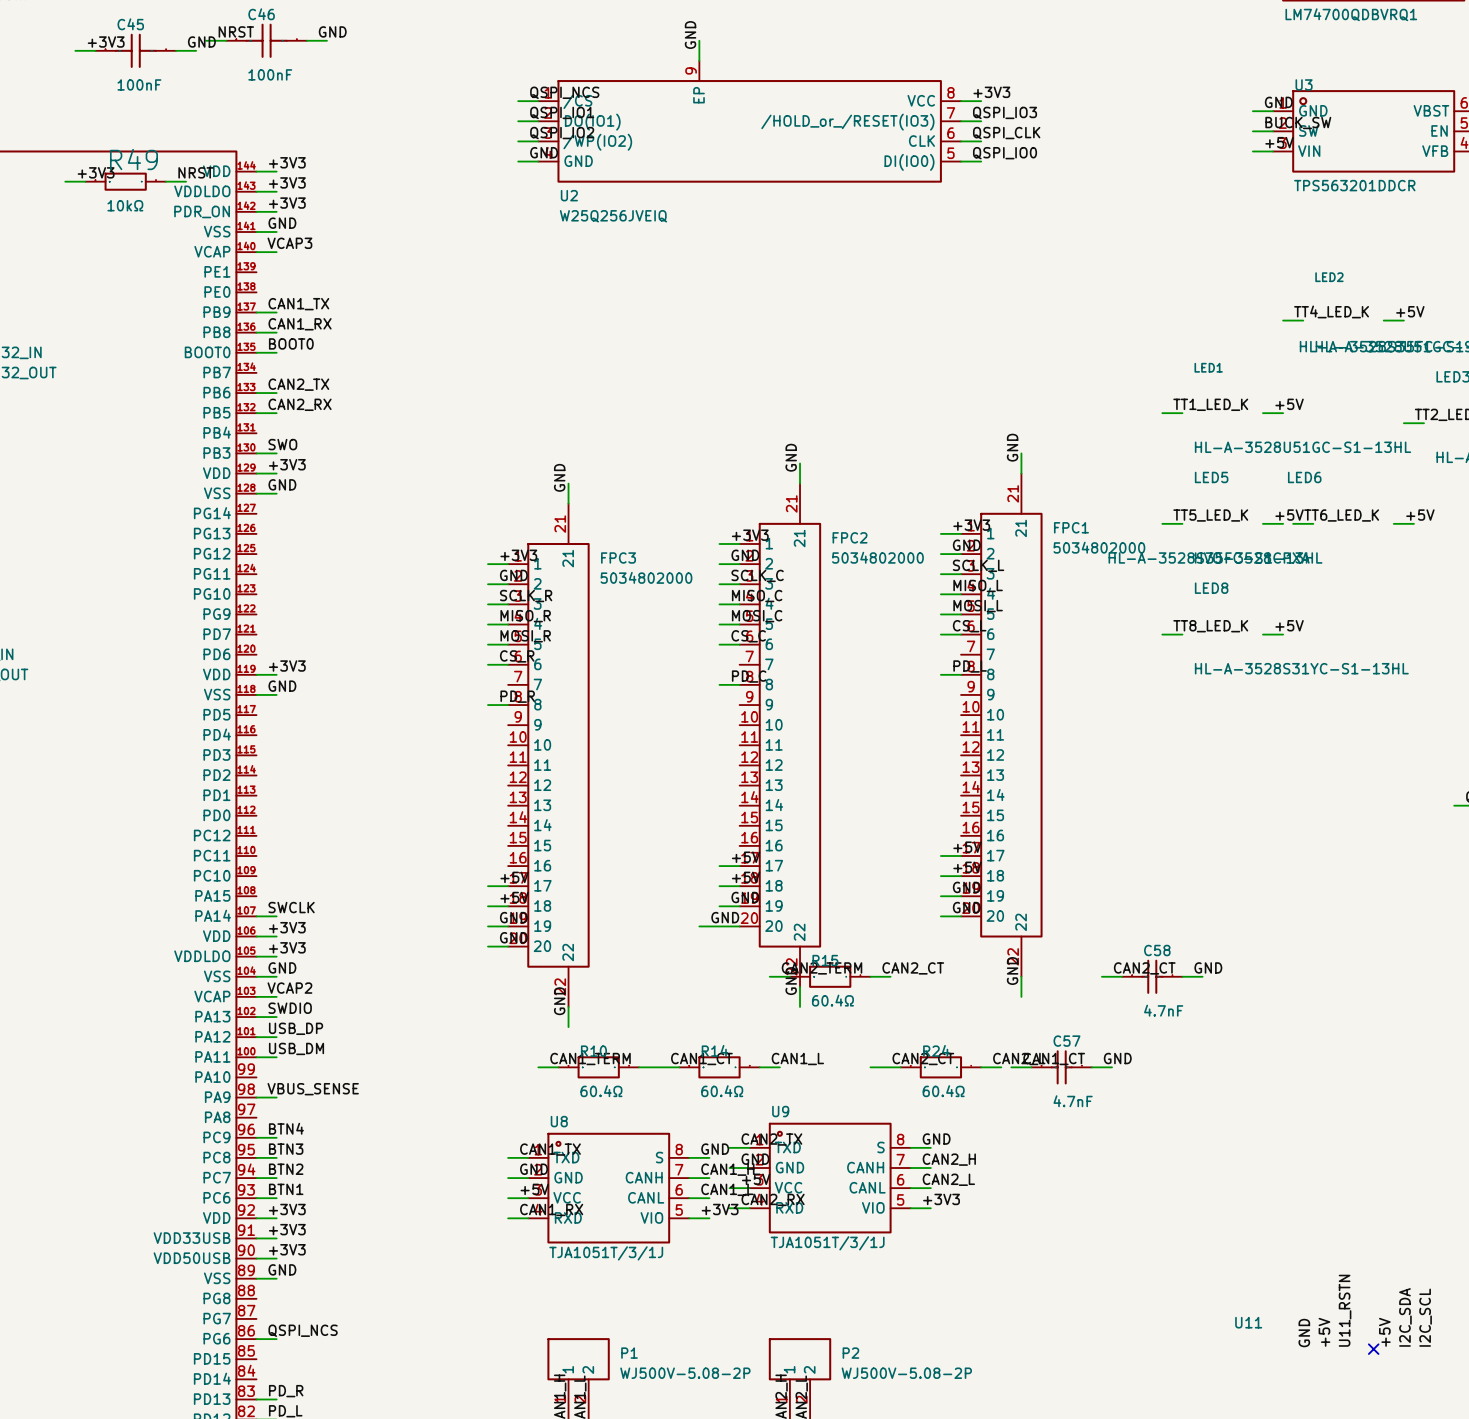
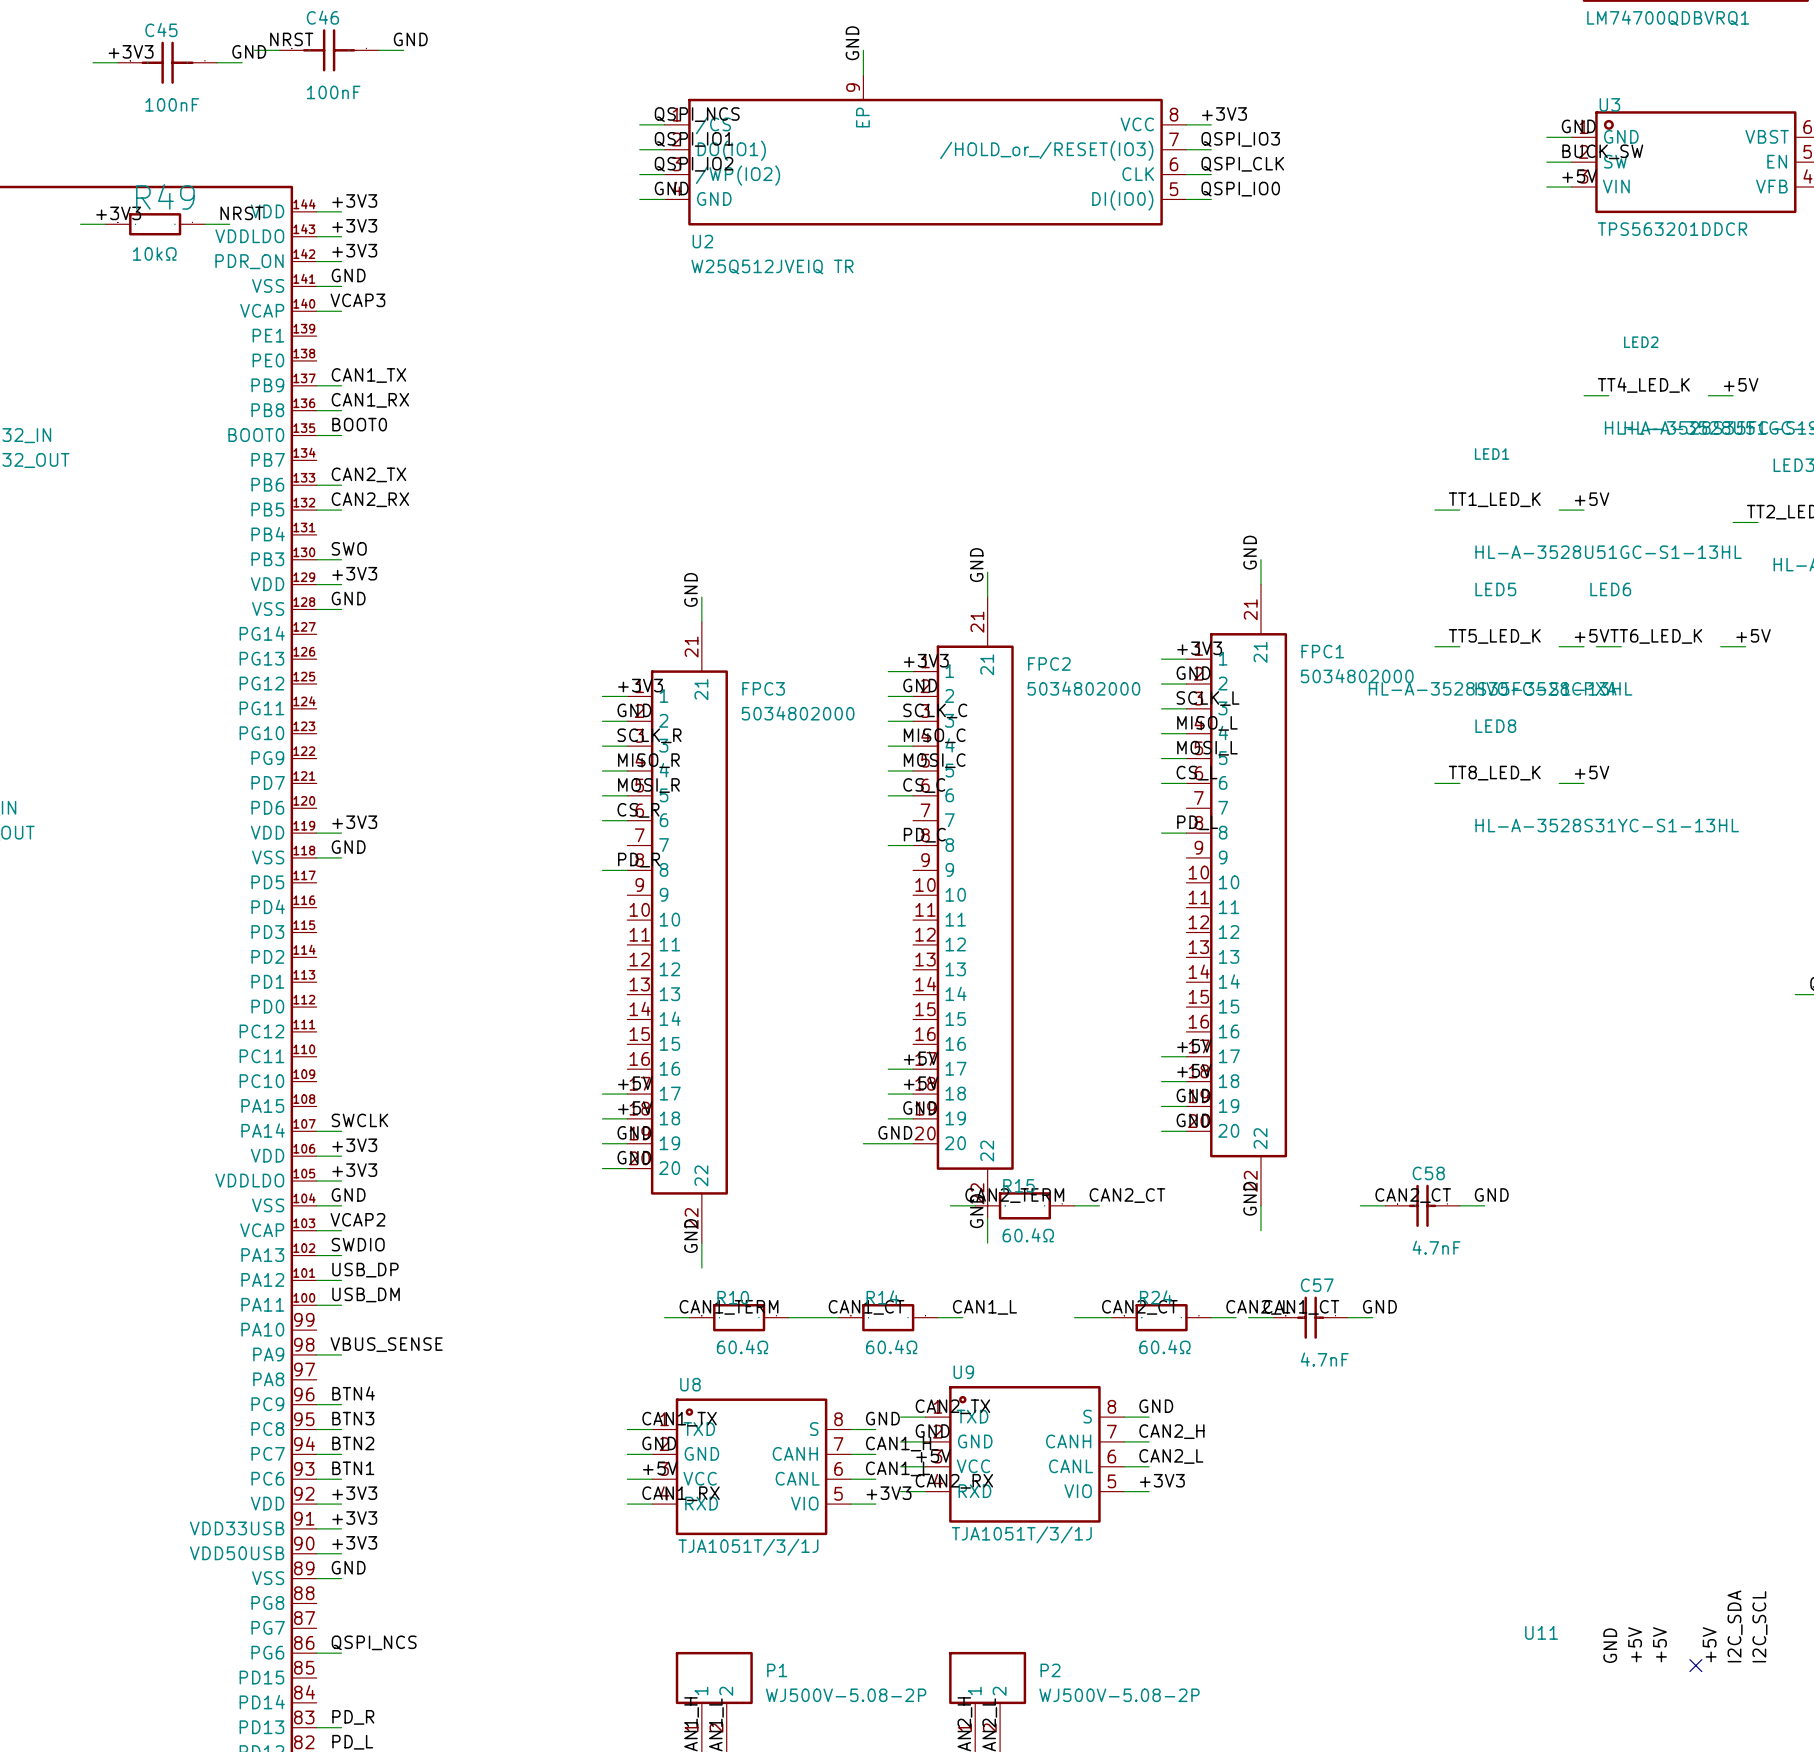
U2 value: W25Q256JVEIQ (613, 216) -> W25Q512JVEIQ TR (772, 266)
label: U11_RSTN (1345, 1310) -> +5V (1659, 1644)

